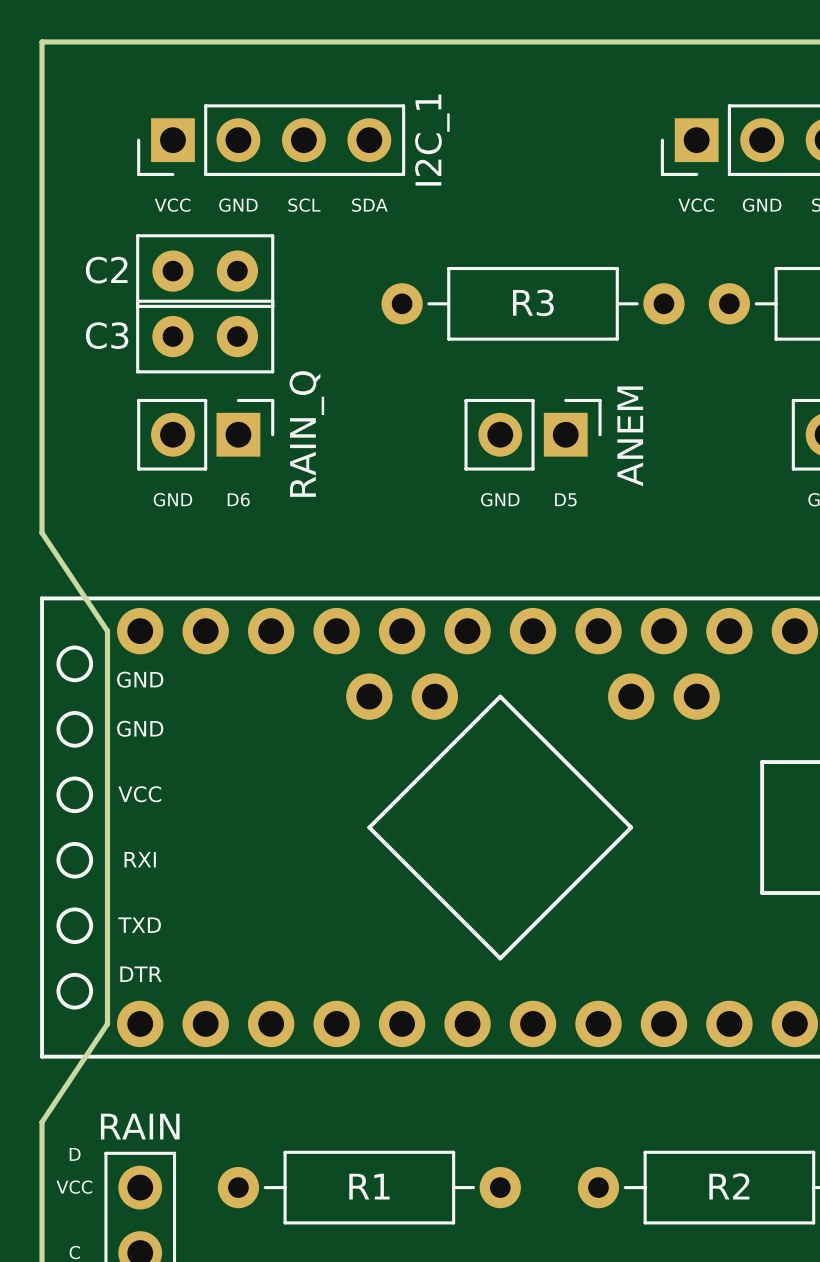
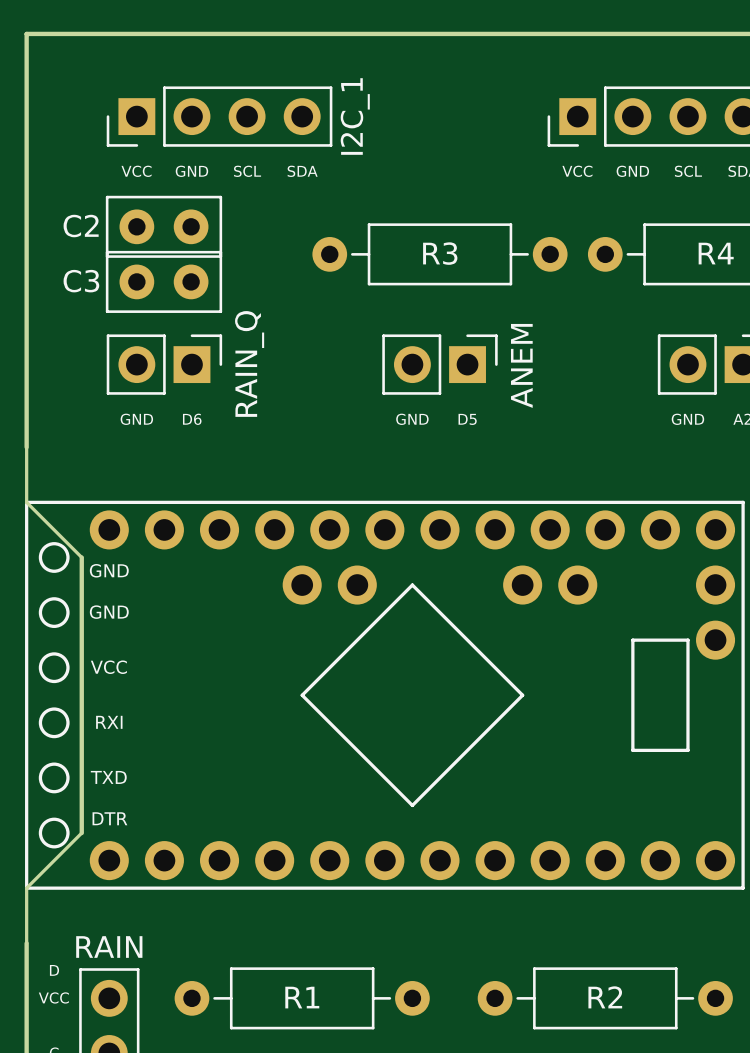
board edge: (42, 532) (107, 631) (107, 663) -> (26, 447) (26, 502) (81, 557)
board edge: (107, 991) (107, 1023) (42, 1122) -> (81, 833) (26, 888) (26, 943)

